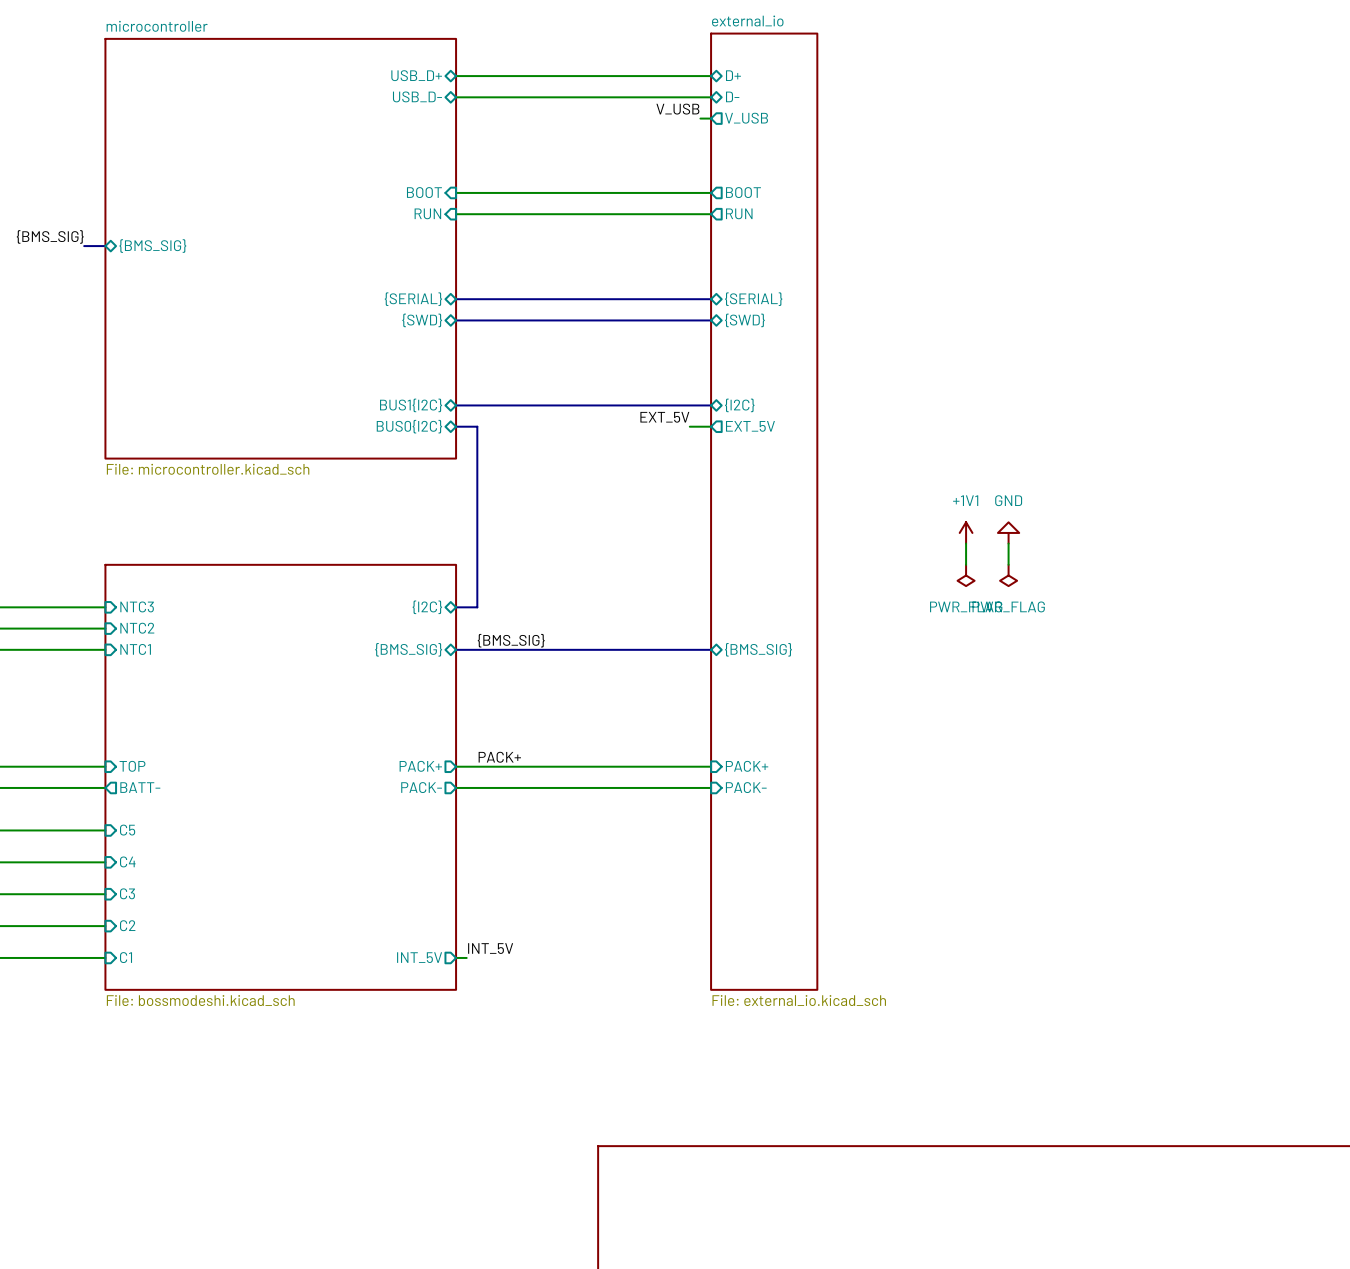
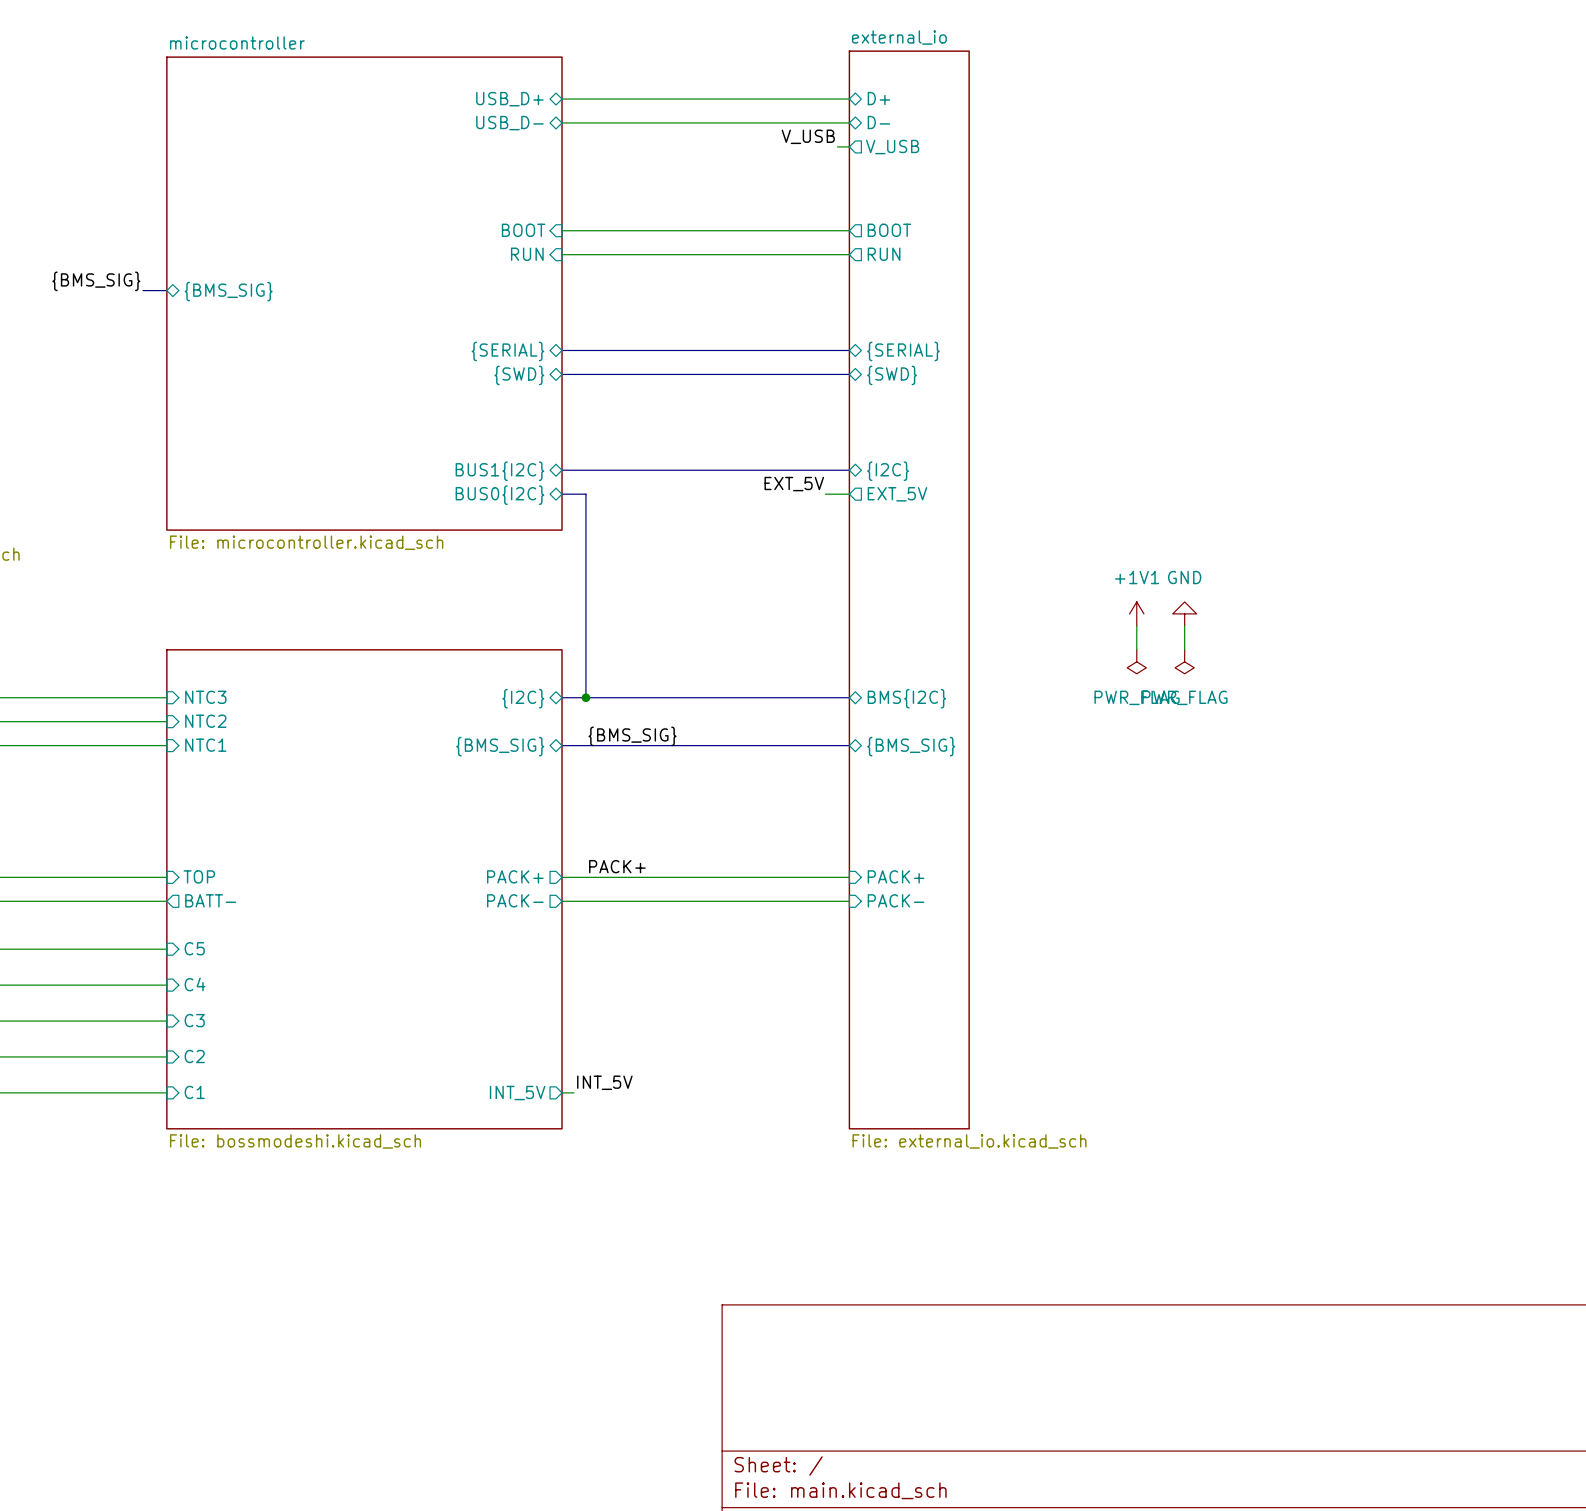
bus: none -> (585, 697) (849, 697)
junction: none -> (585, 697)
sheet pin: none -> BMS{I2C} (906, 698)

